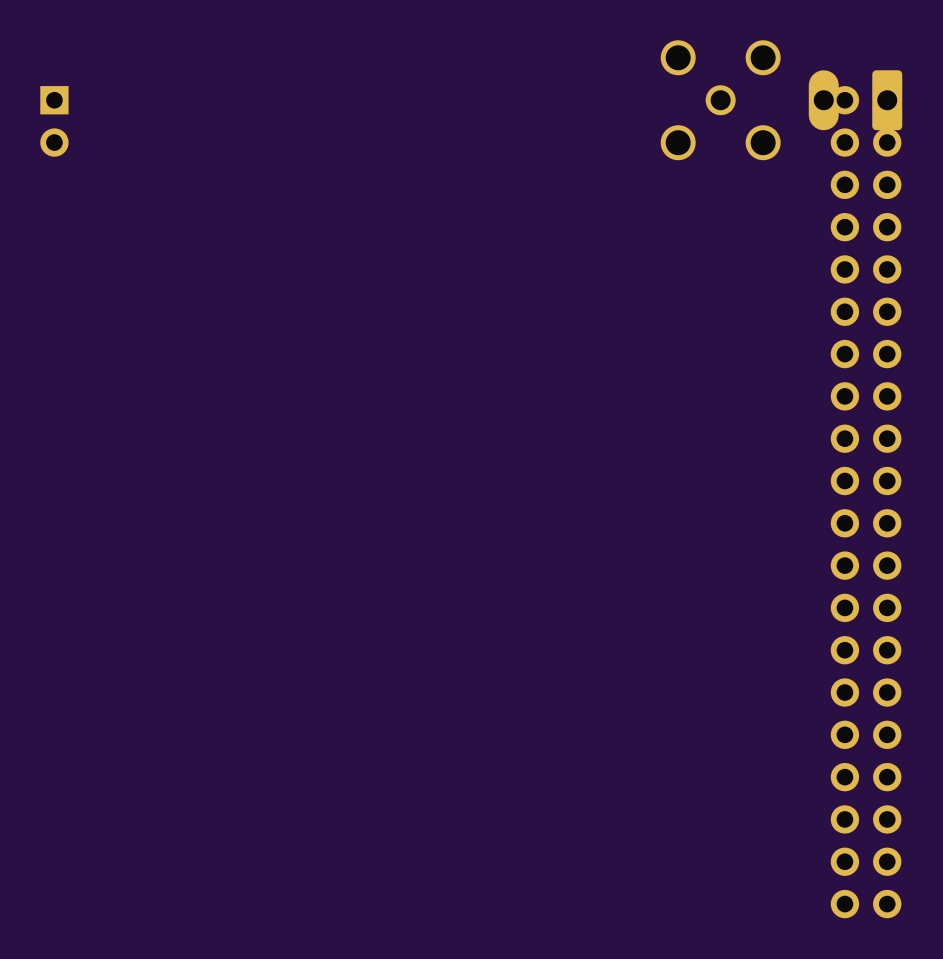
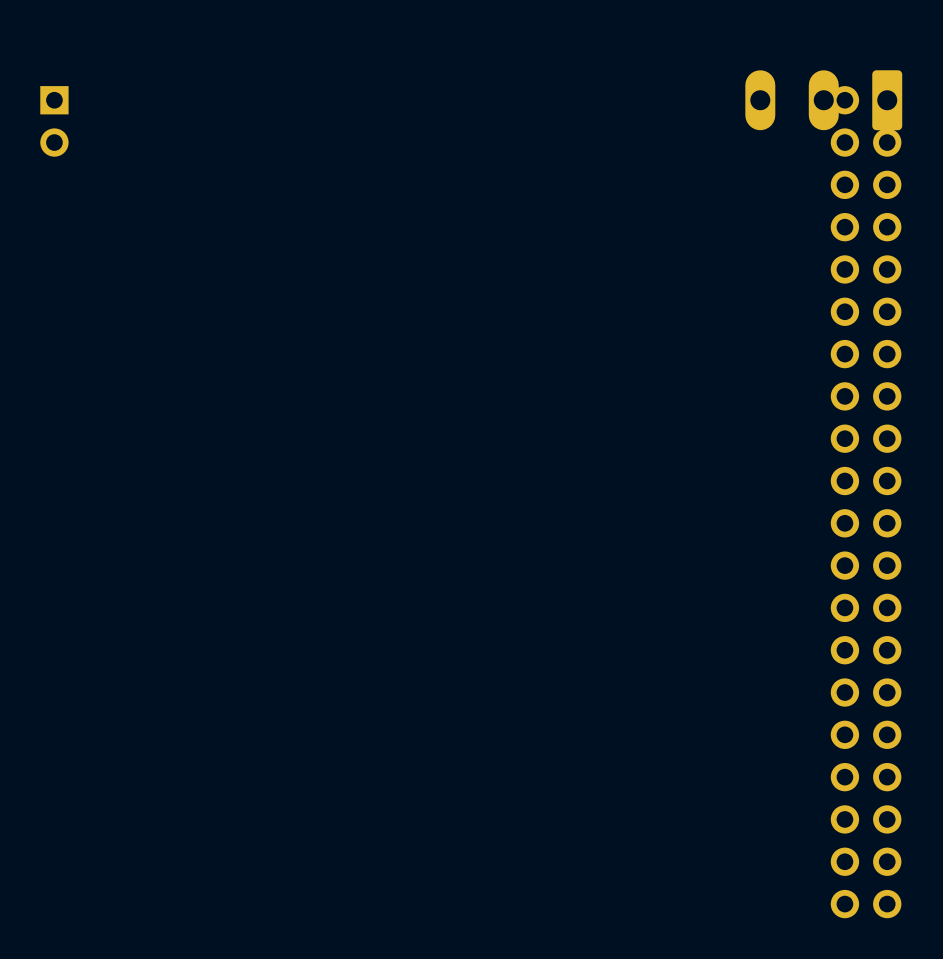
part: (720, 100) -> none
part: none -> (823, 100)

